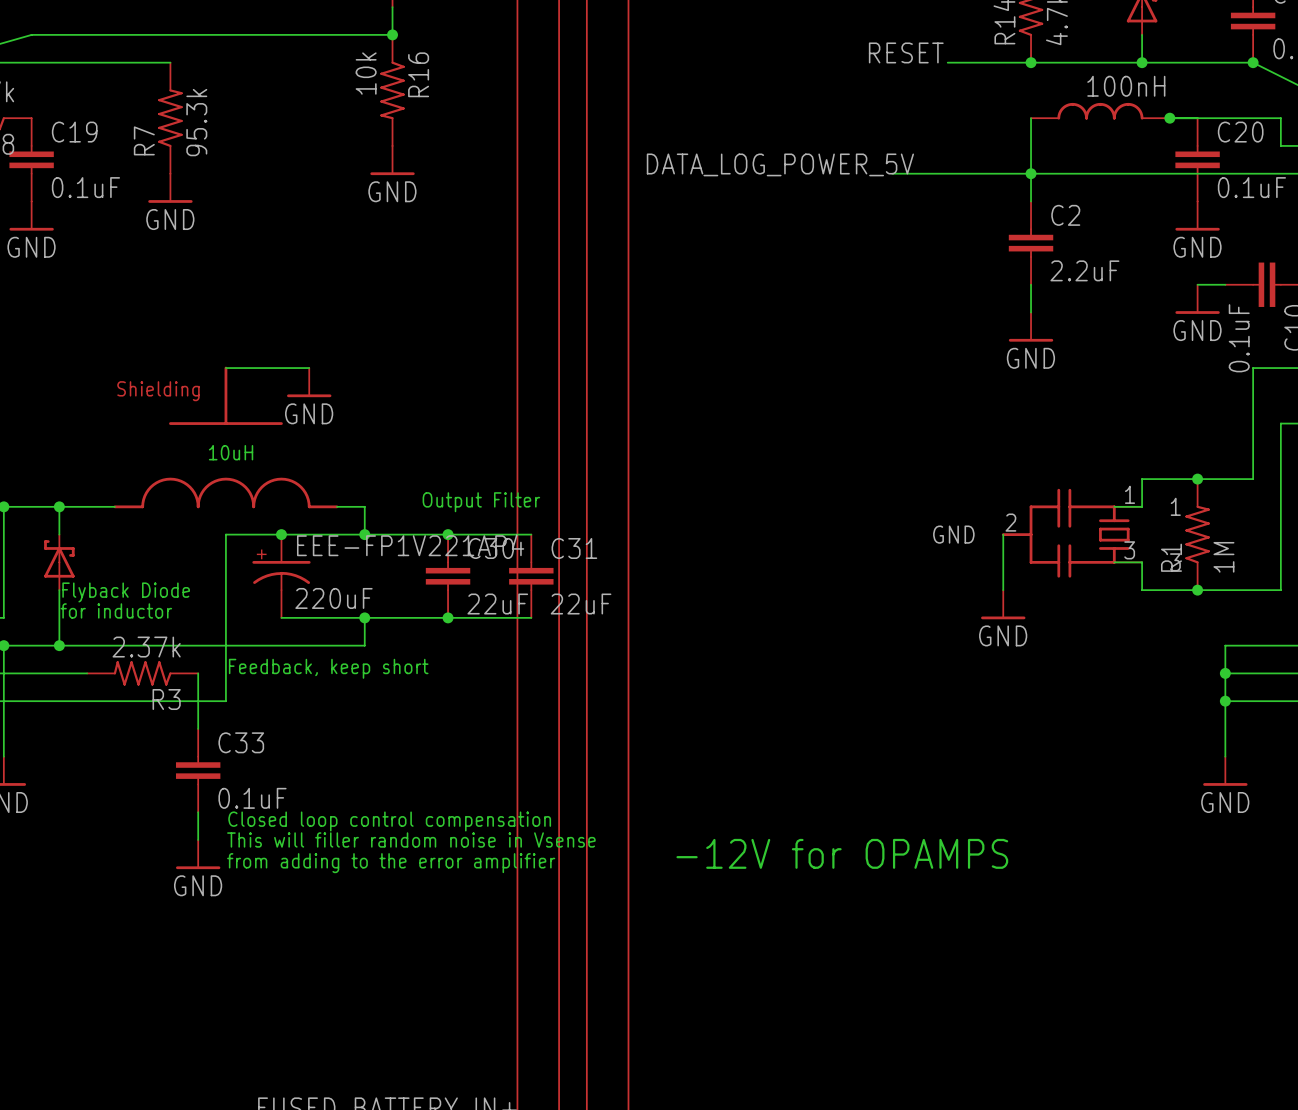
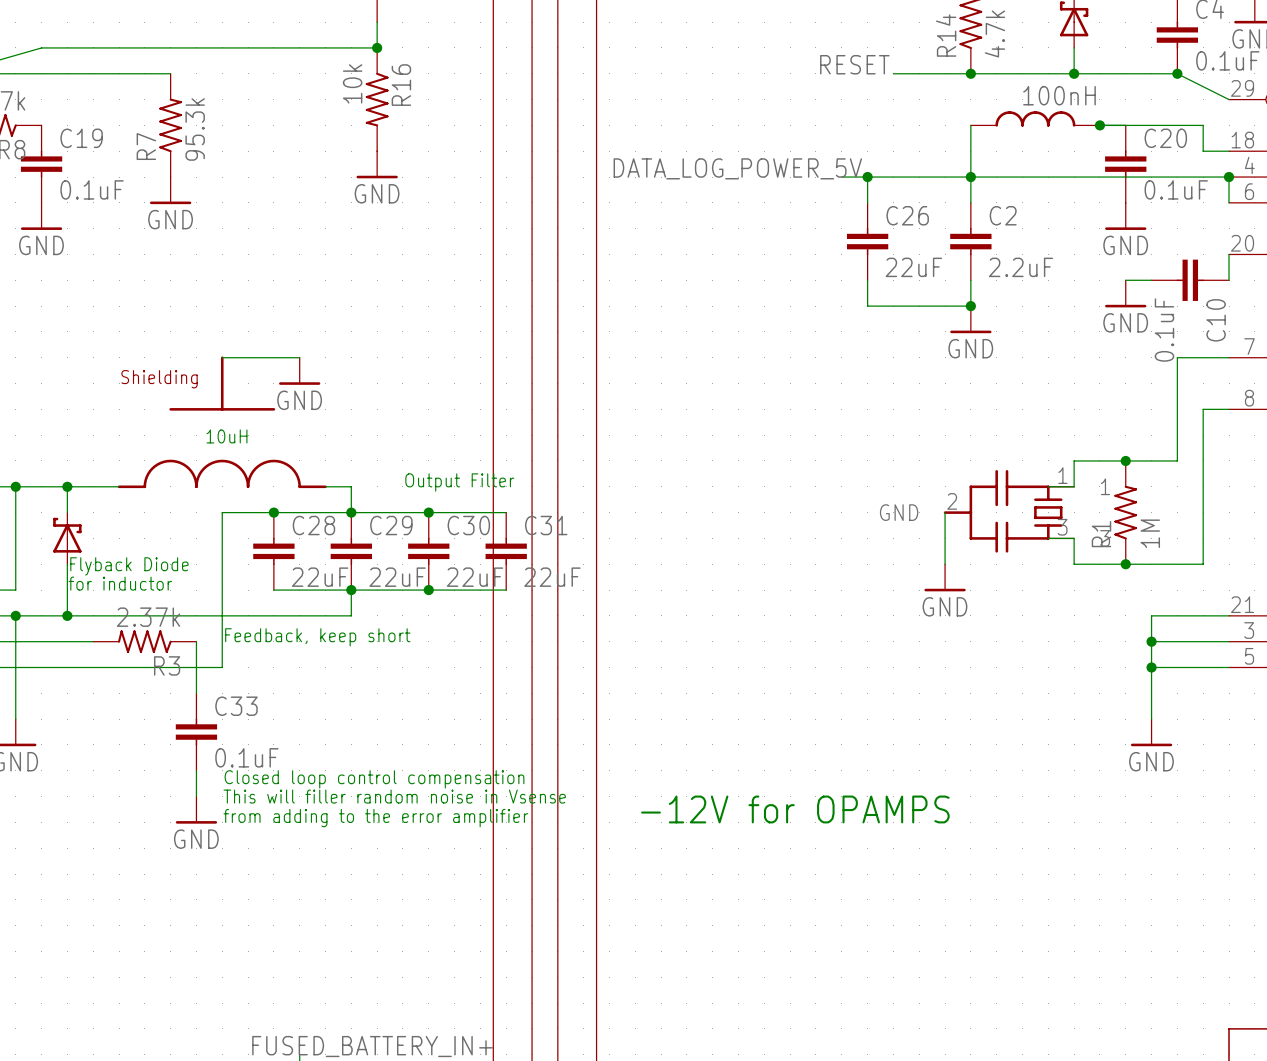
wire: none -> (867, 177) (867, 202)
junction: none -> (867, 177)
C26: none -> 22uF (867, 241)
wire: none -> (867, 280) (867, 306) (970, 306)
junction: none -> (970, 306)
EEE-FP1V221AP4: 220uF (281, 576) -> none
C28: none -> 22uF (273, 551)
C29: none -> 22uF (351, 551)

